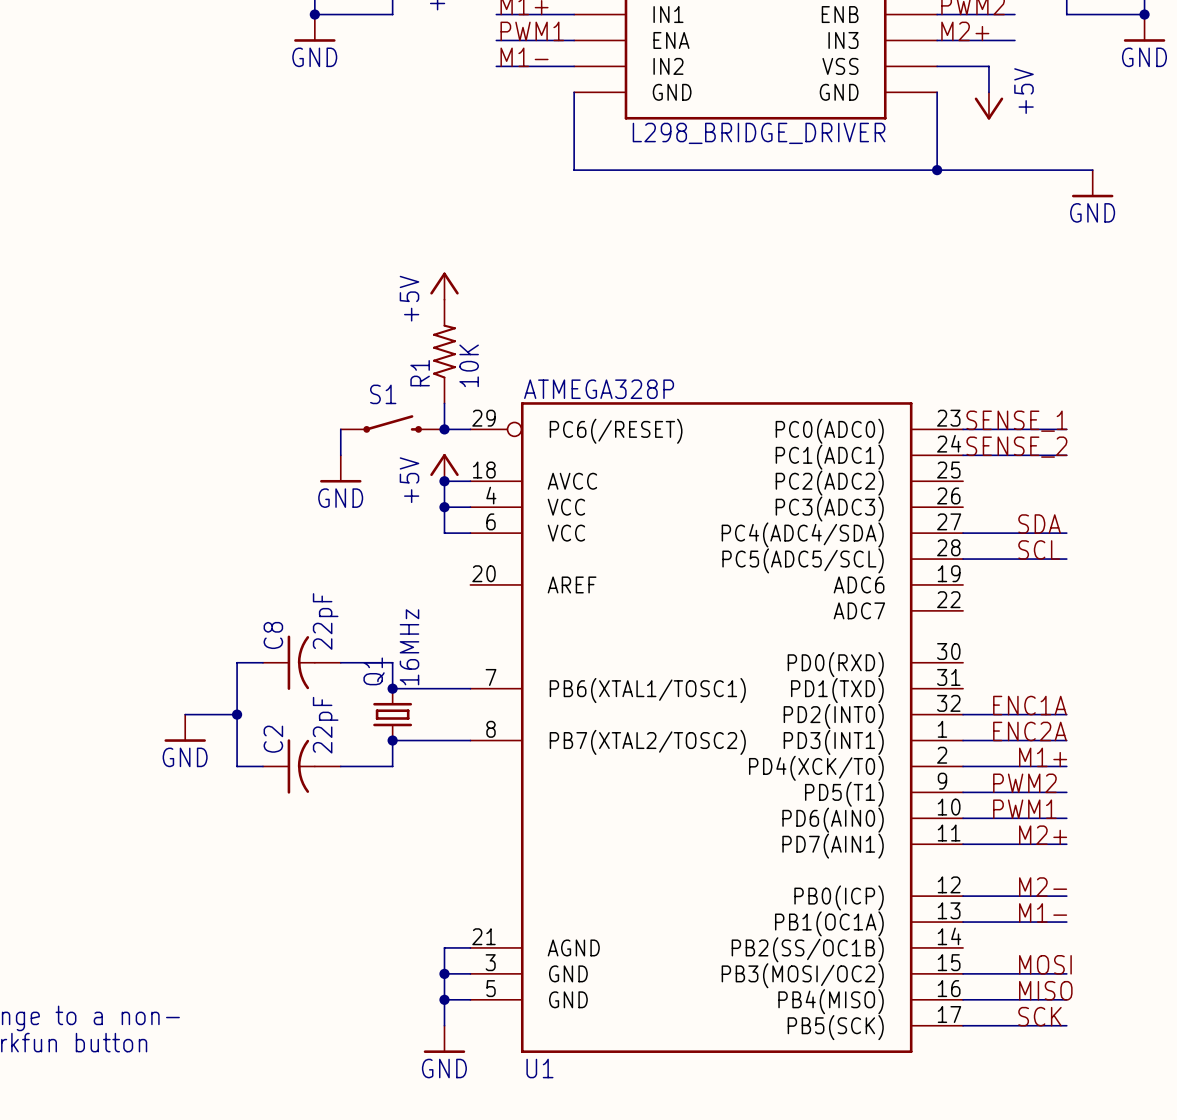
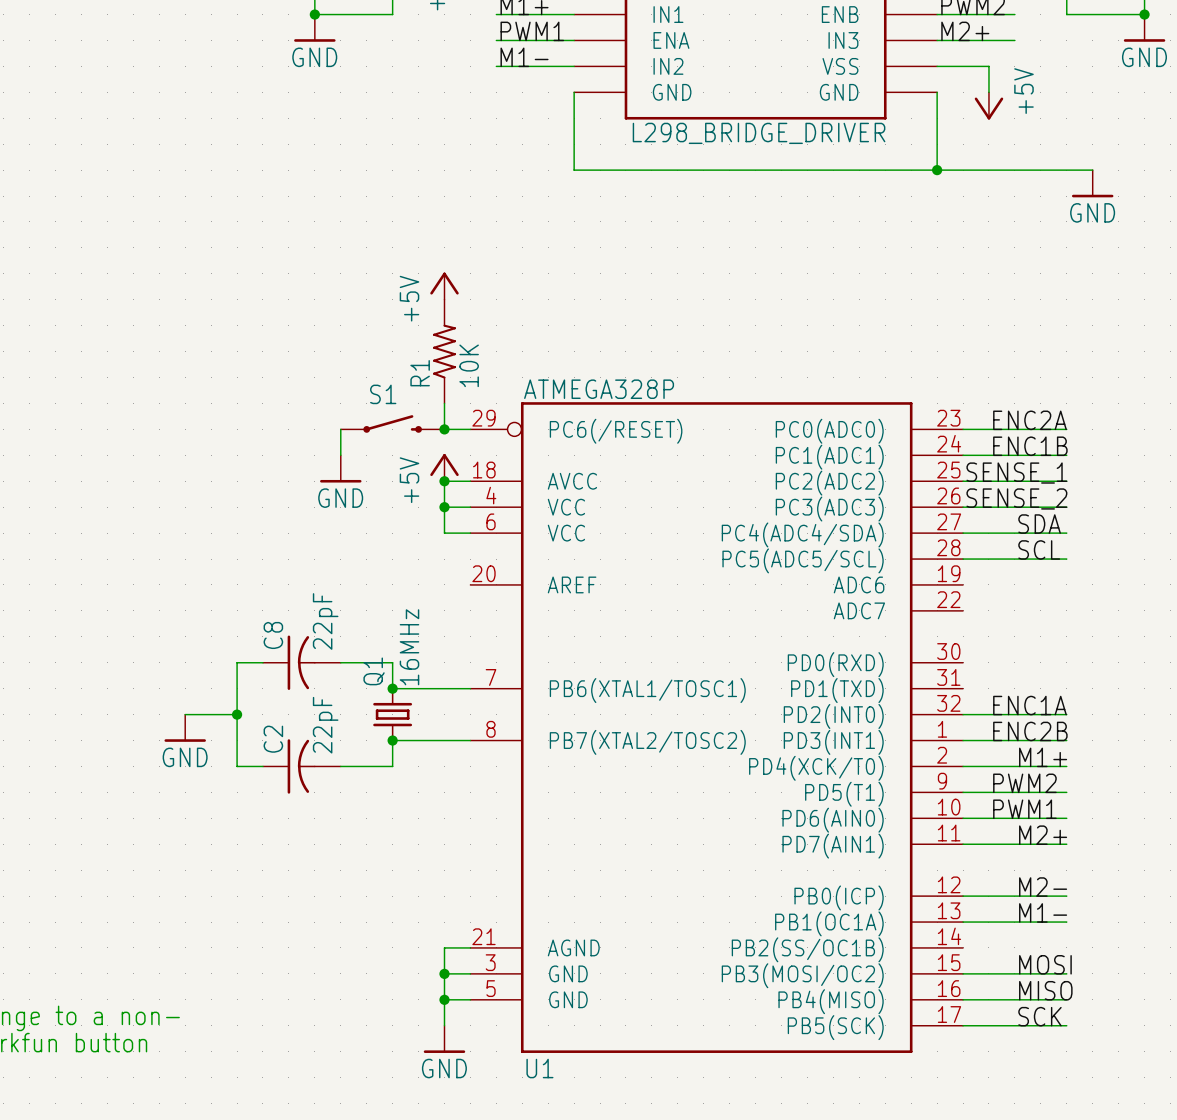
label: none -> ENC2A (1029, 420)
label position: SENSE_1 (1016, 421) -> SENSE_1 (1016, 473)
label: none -> ENC1B (1030, 446)
label position: SENSE_2 (1016, 447) -> SENSE_2 (1016, 498)
wire: none -> (963, 481) (1066, 481)
wire: none -> (963, 507) (1066, 507)
label: ENC2A (1029, 731) -> ENC2B (1030, 731)

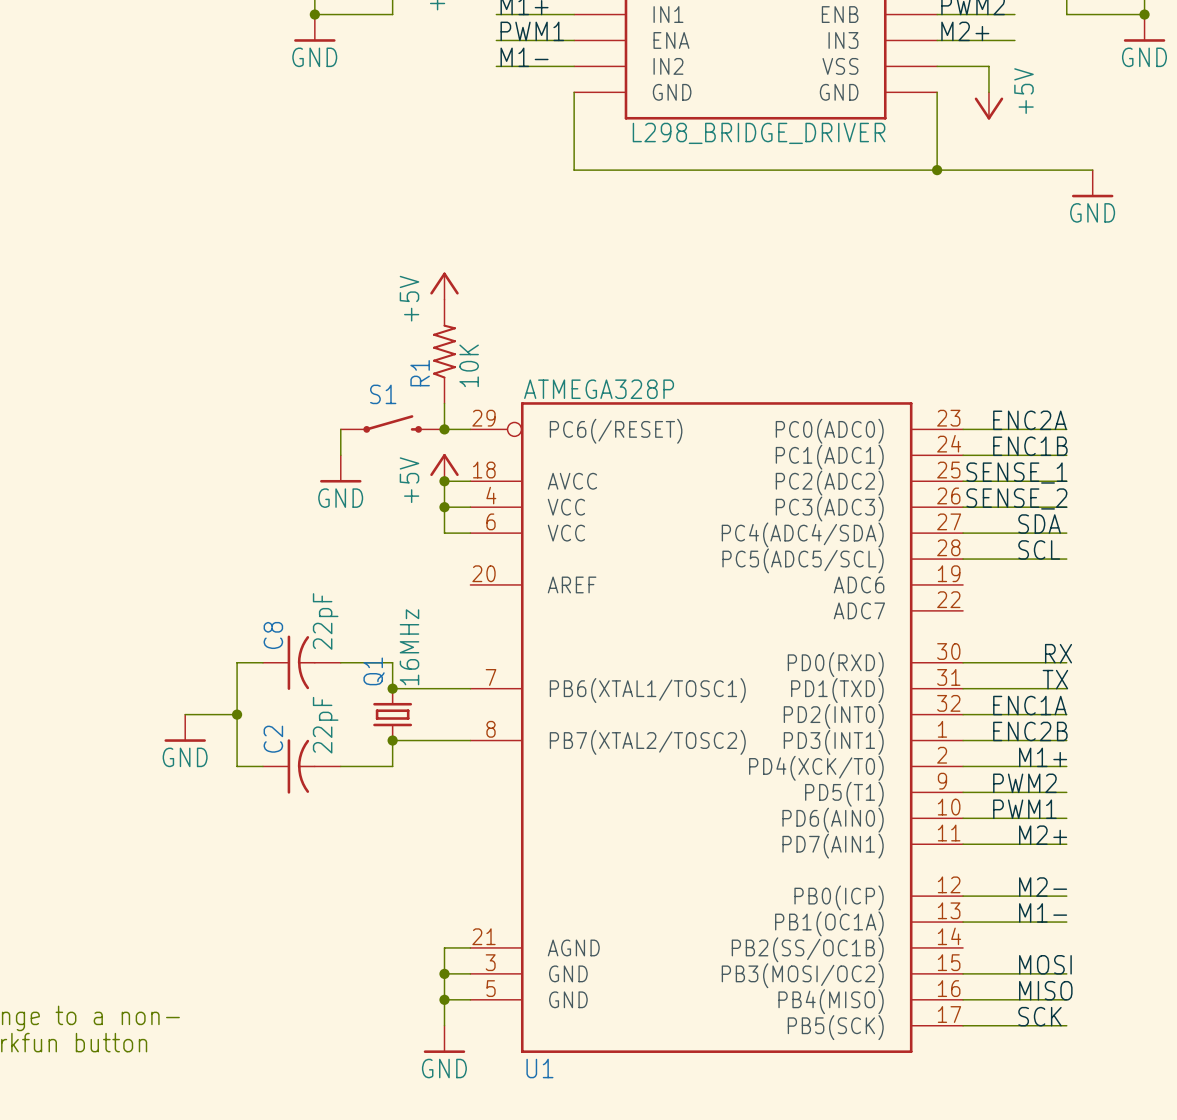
label: none -> RX (1058, 653)
wire: none -> (963, 662) (1066, 662)
label: none -> TX (1055, 679)
wire: none -> (963, 688) (1066, 688)

